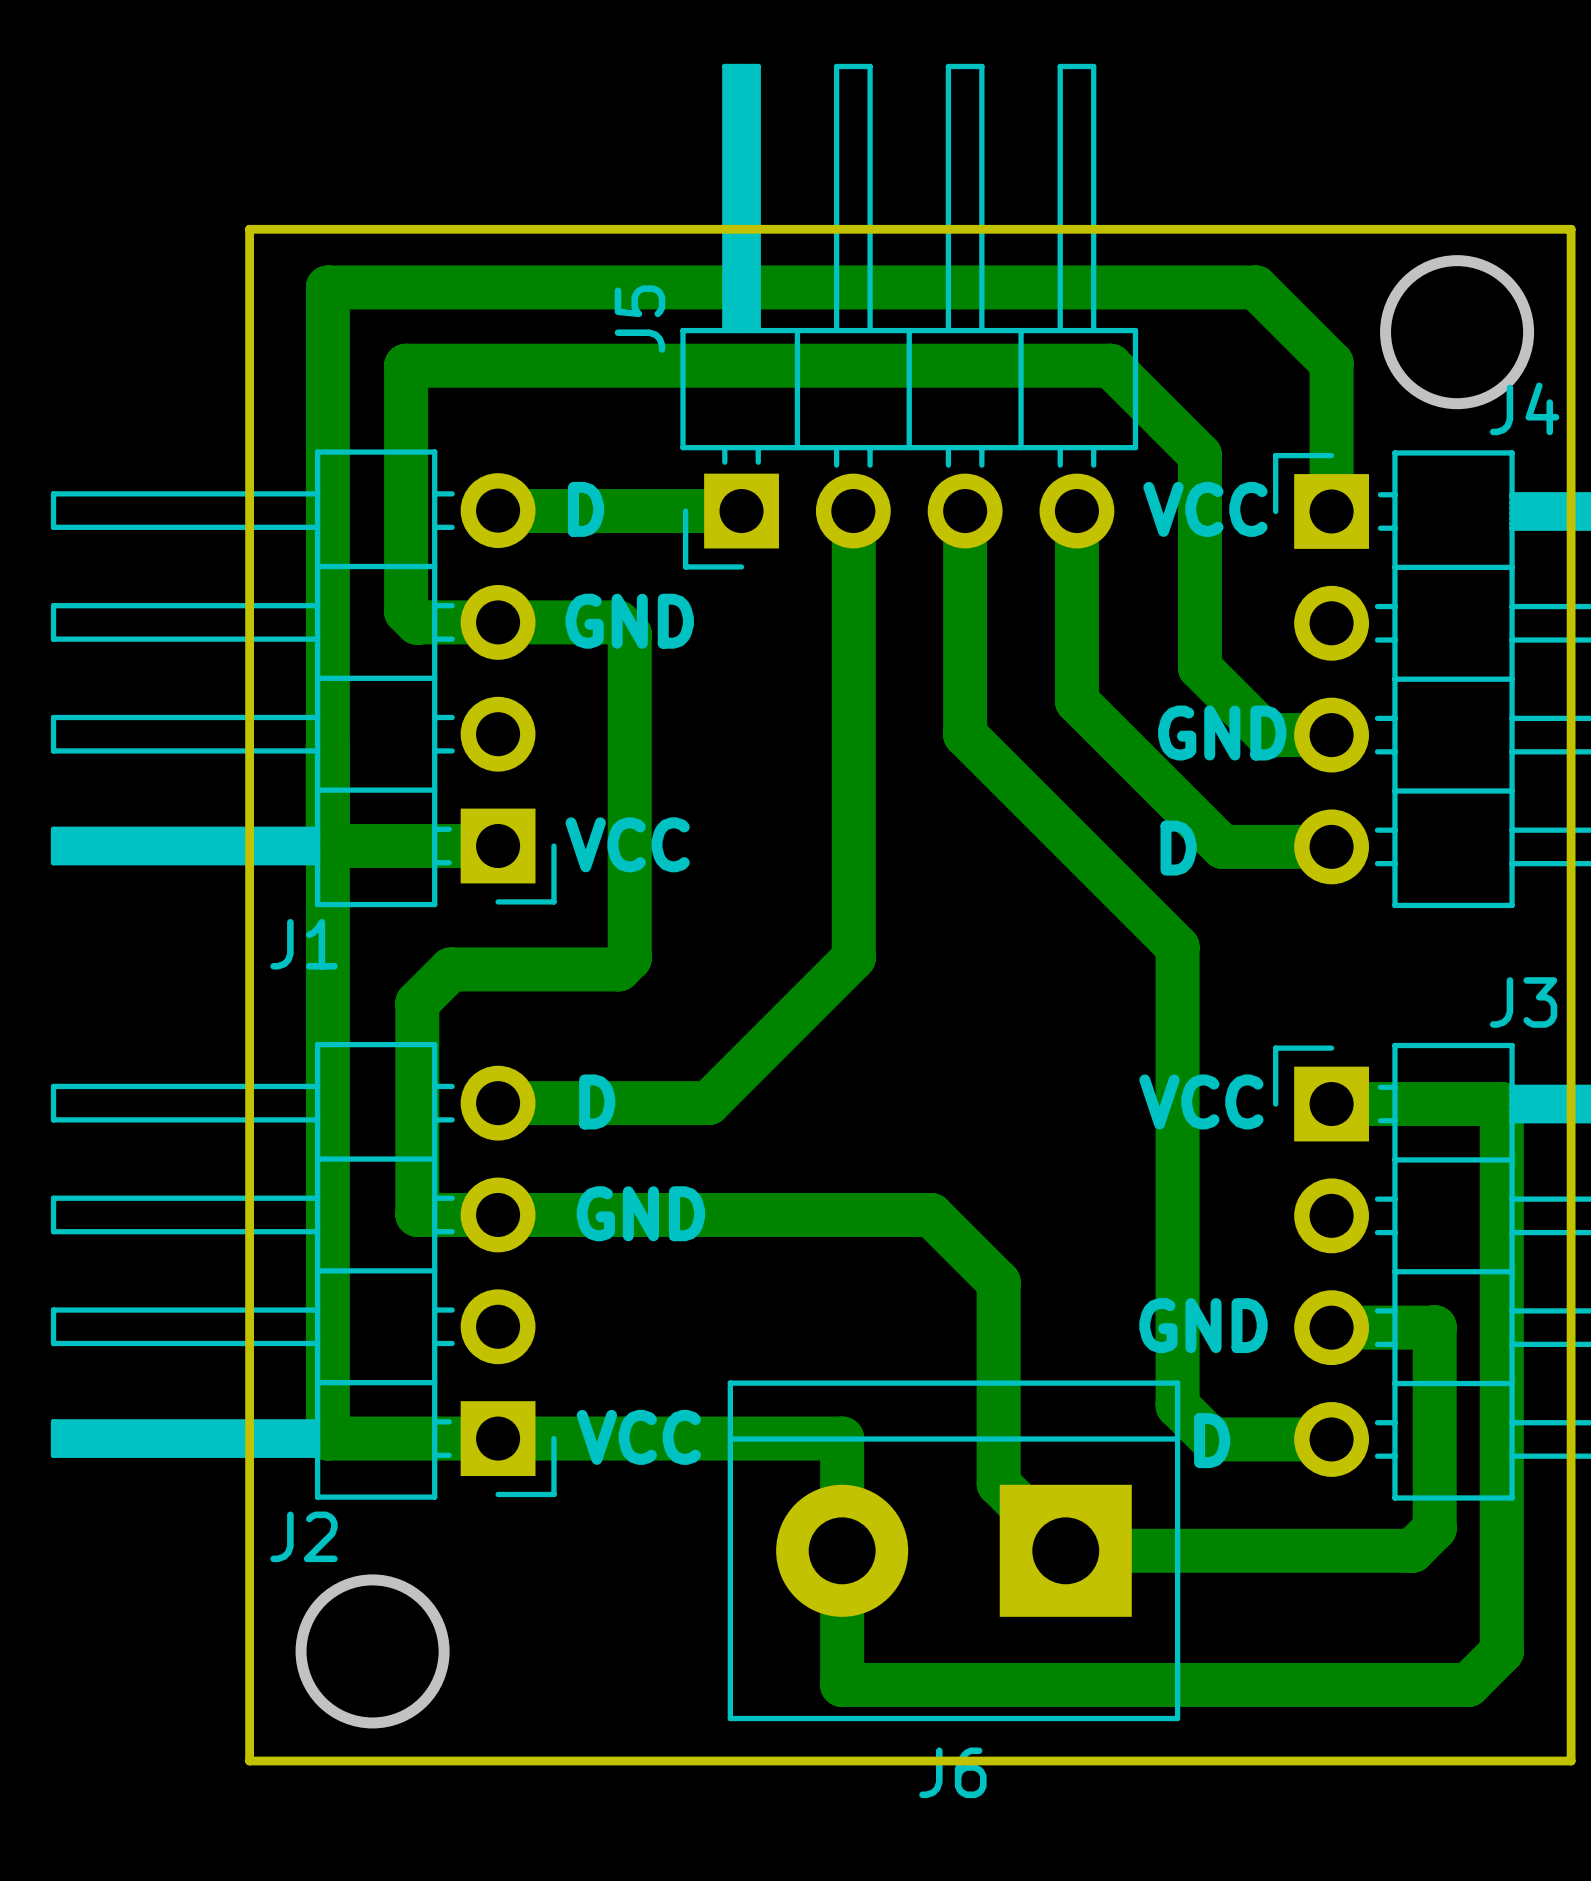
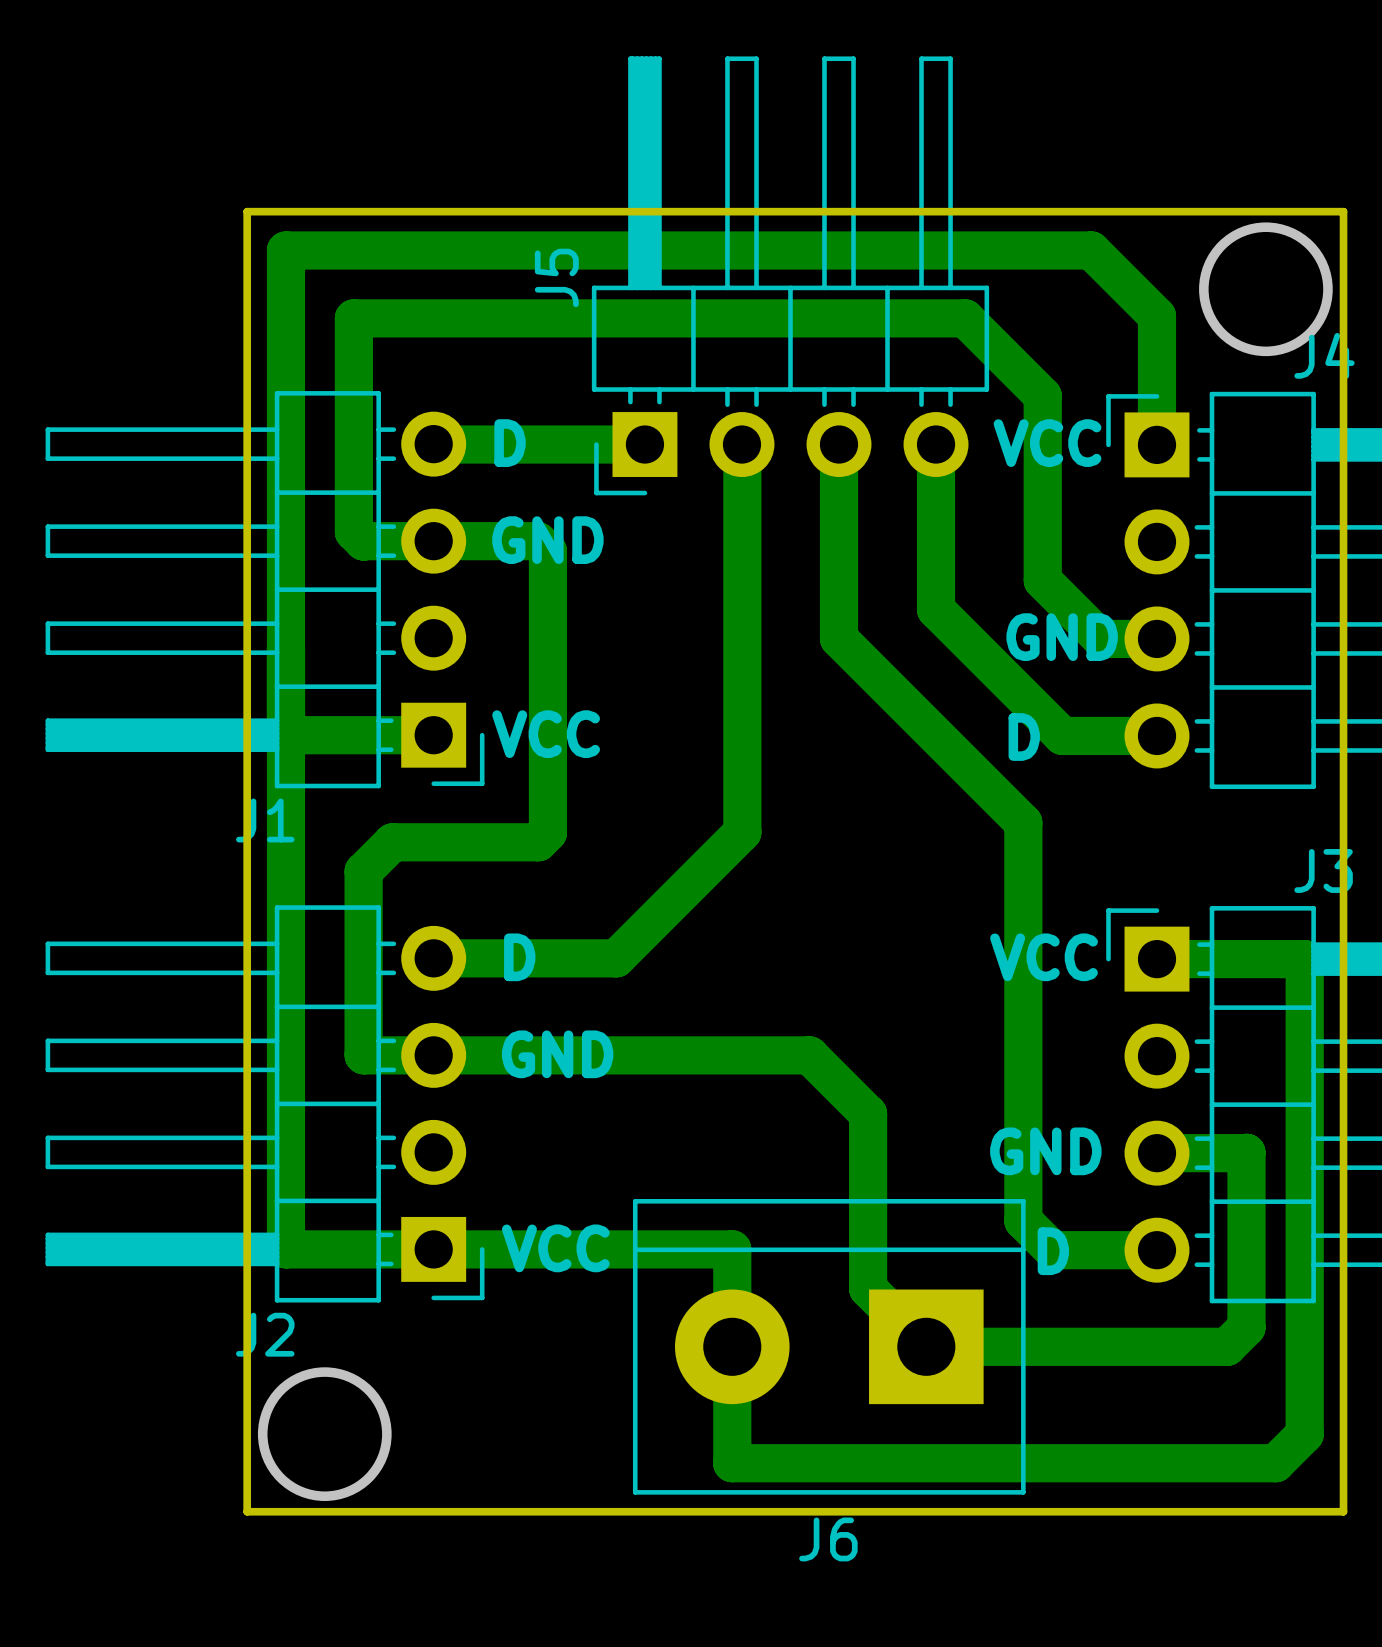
board edge: (249, 229) (1571, 229) (1571, 1761) (249, 1761) (249, 229) -> (247, 211) (247, 1511) (1343, 1511) (1343, 211) (247, 211)

